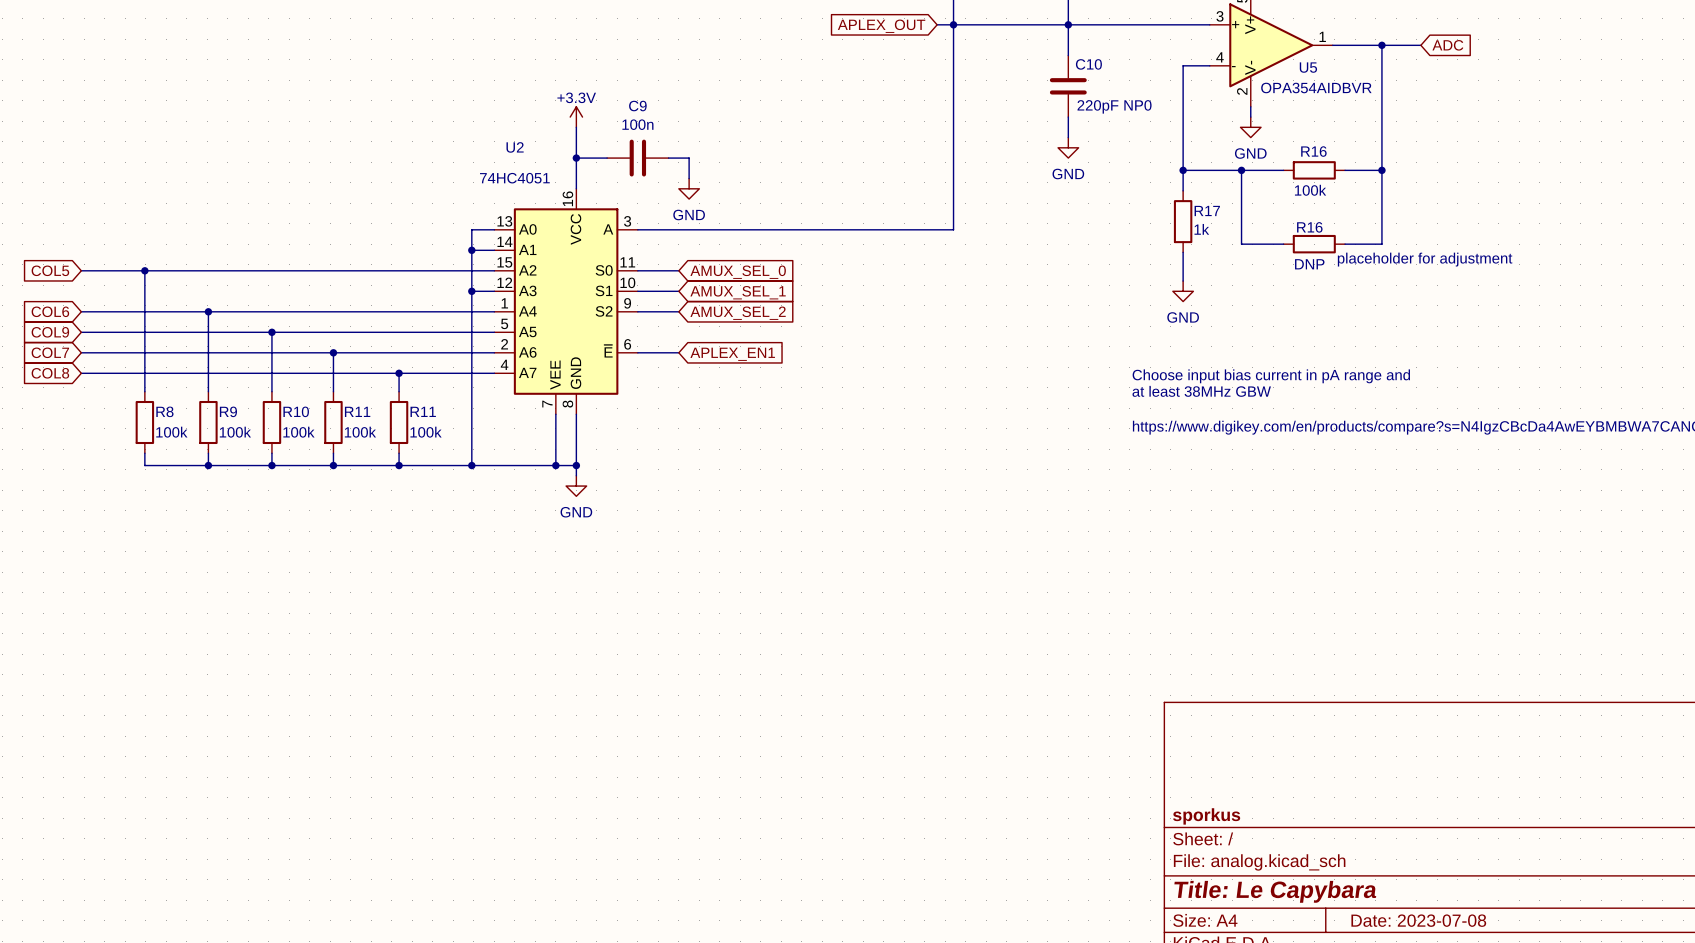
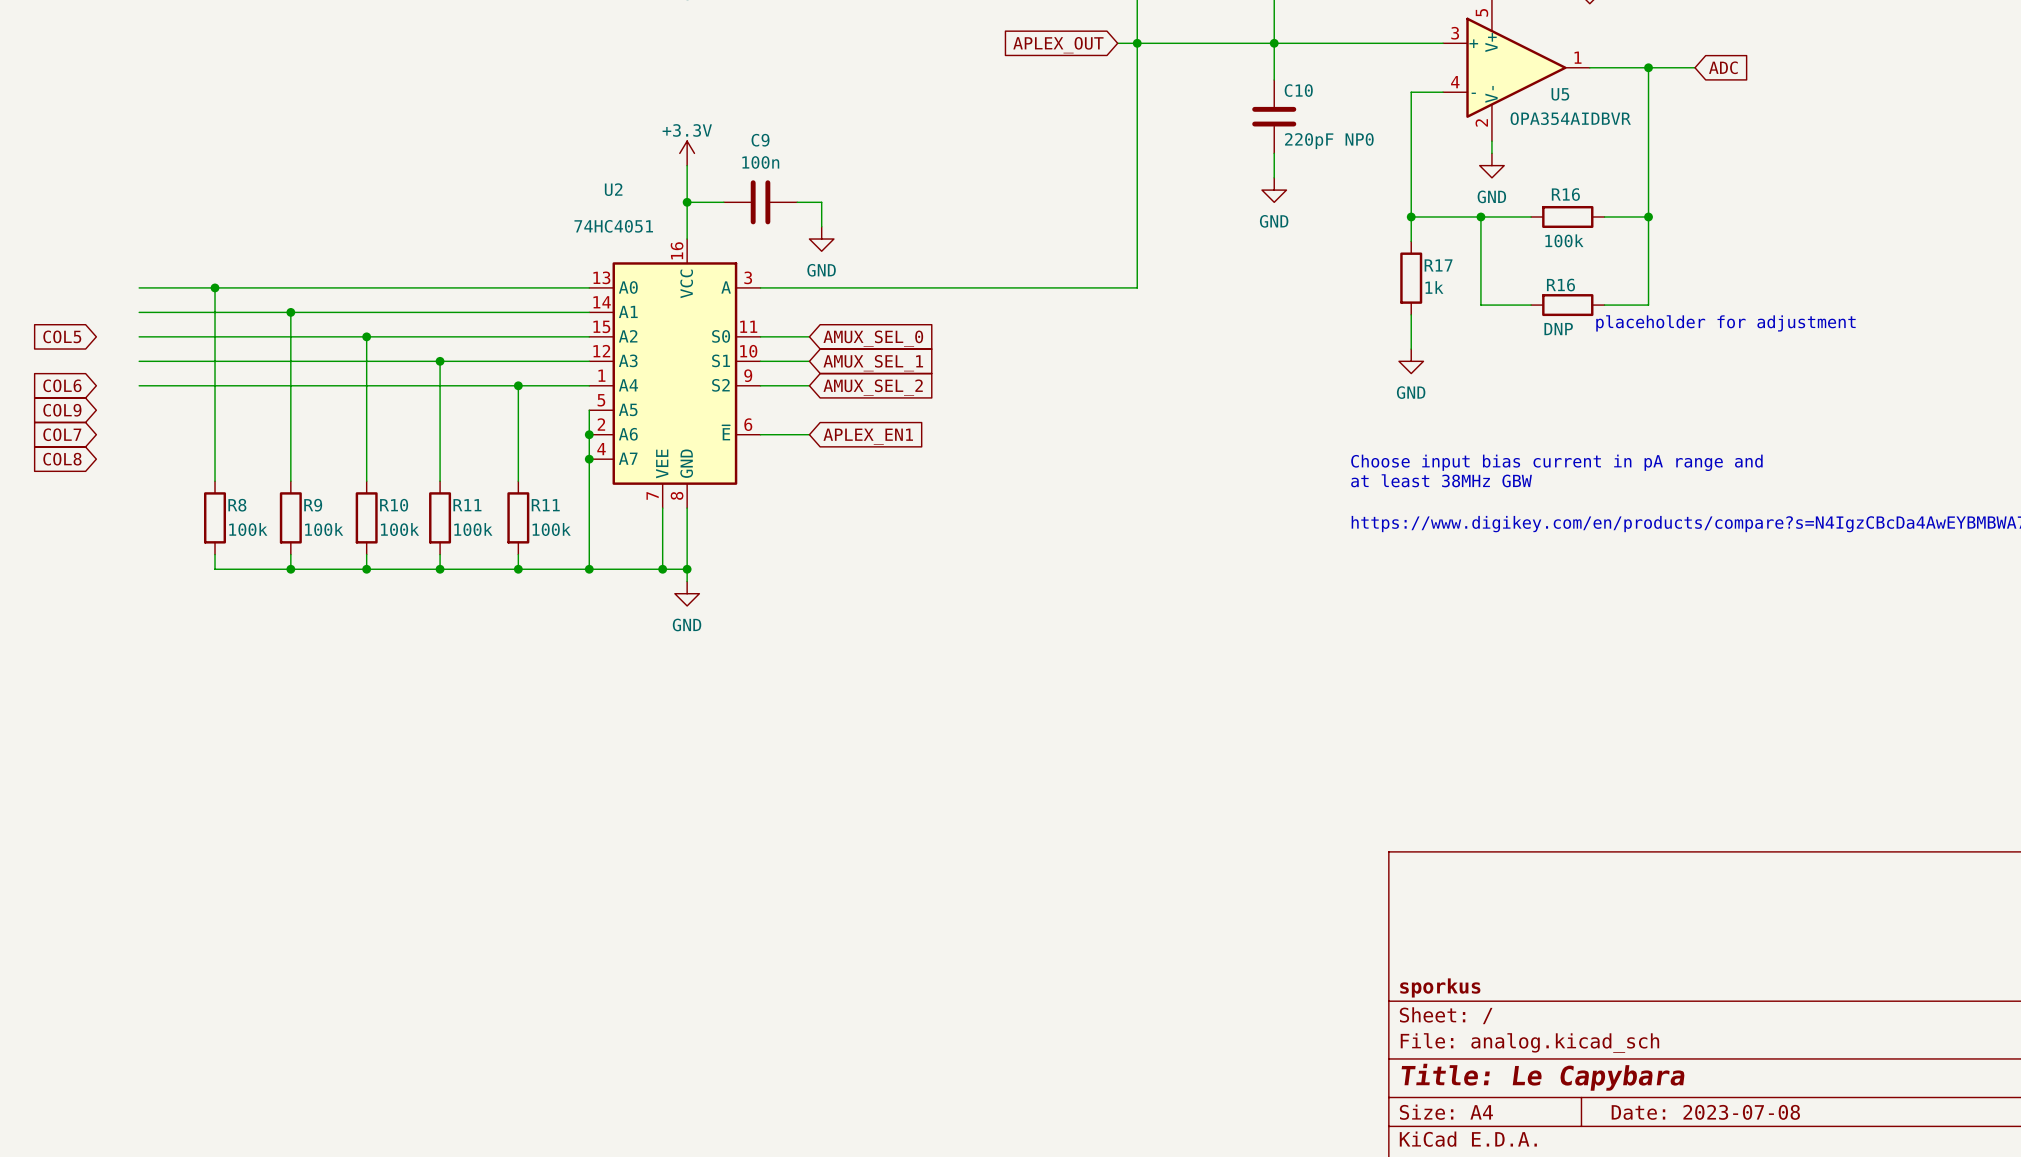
wire: none -> (215, 287) (215, 481)
junction: none -> (215, 287)
wire: (471, 229) (471, 465) -> (562, 287) (139, 287)
wire: none -> (139, 312) (562, 312)
wire: none -> (290, 312) (290, 481)
junction: none -> (290, 312)
junction: (471, 250) -> none
wire: (81, 270) (117, 270) -> none
wire: (144, 270) (144, 391) -> (366, 336) (366, 481)
junction: (144, 270) -> none
junction: none -> (366, 336)
wire: none -> (139, 361) (562, 361)
wire: none -> (440, 361) (440, 481)
junction: none -> (440, 361)
junction: (471, 291) -> none
wire: (81, 311) (117, 311) -> none
wire: (208, 311) (208, 391) -> none
junction: (208, 311) -> none
wire: none -> (518, 385) (518, 481)
junction: none -> (518, 385)
wire: (81, 332) (494, 332) -> (589, 569) (589, 410)
wire: (271, 332) (271, 391) -> none
junction: (271, 332) -> none
wire: (81, 352) (494, 352) -> none
wire: (333, 352) (333, 391) -> none
junction: (333, 352) -> none
junction: none -> (589, 434)
wire: (81, 373) (494, 373) -> none
wire: (399, 373) (399, 391) -> none
junction: (399, 373) -> none
junction: none -> (589, 459)
R8 position: (144, 422) -> (215, 517)
R9 position: (208, 422) -> (290, 517)
R10 position: (271, 422) -> (366, 517)
R11: 100k (333, 422) -> none
R11: none -> 100k (440, 517)
R11: 100k (399, 422) -> none
R11: none -> 100k (518, 517)
wire: (144, 453) (144, 465) (180, 465) -> (215, 554) (215, 569)
wire: (208, 453) (208, 465) -> (290, 554) (290, 569)
wire: (271, 453) (271, 465) -> (366, 554) (366, 569)
wire: (333, 453) (333, 465) -> (440, 554) (440, 569)
wire: (399, 453) (399, 465) -> (518, 554) (518, 569)
junction: (208, 465) -> none
junction: none -> (290, 569)
junction: (271, 465) -> none
junction: none -> (366, 569)
junction: (333, 465) -> none
junction: none -> (440, 569)
junction: (399, 465) -> none
junction: none -> (518, 569)
junction: (471, 465) -> none
junction: none -> (589, 569)

